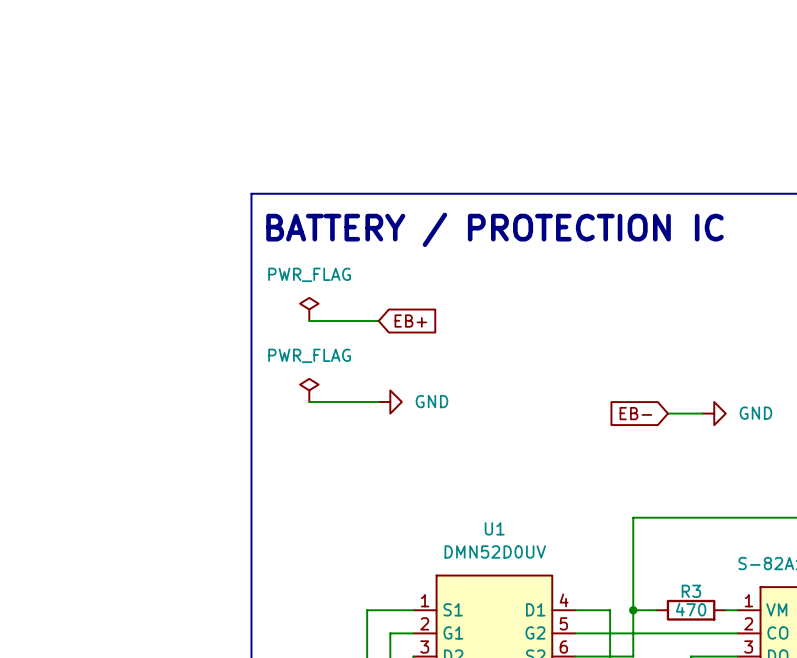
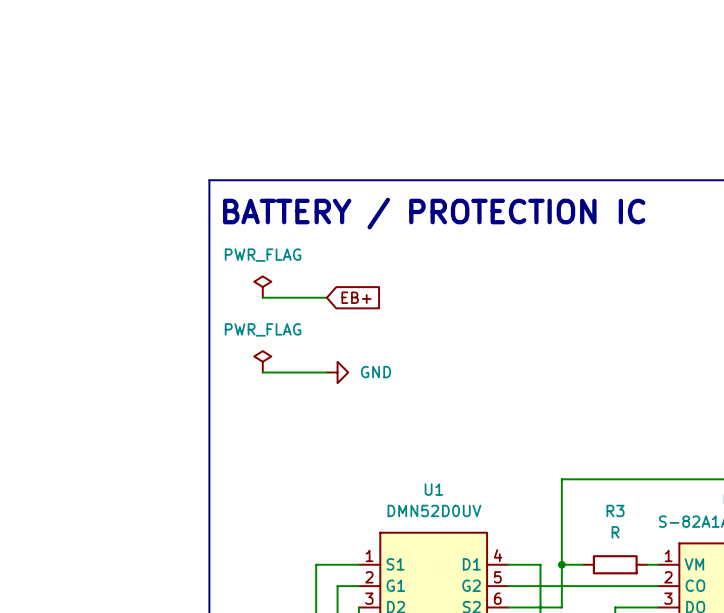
global label: EB- (635, 413) -> none
wire: (667, 413) (702, 413) -> none
power symbol: GND (714, 413) -> none
R3 name position: R3 (691, 591) -> R3 (615, 510)
R3 value: 470 (691, 609) -> R (615, 532)

